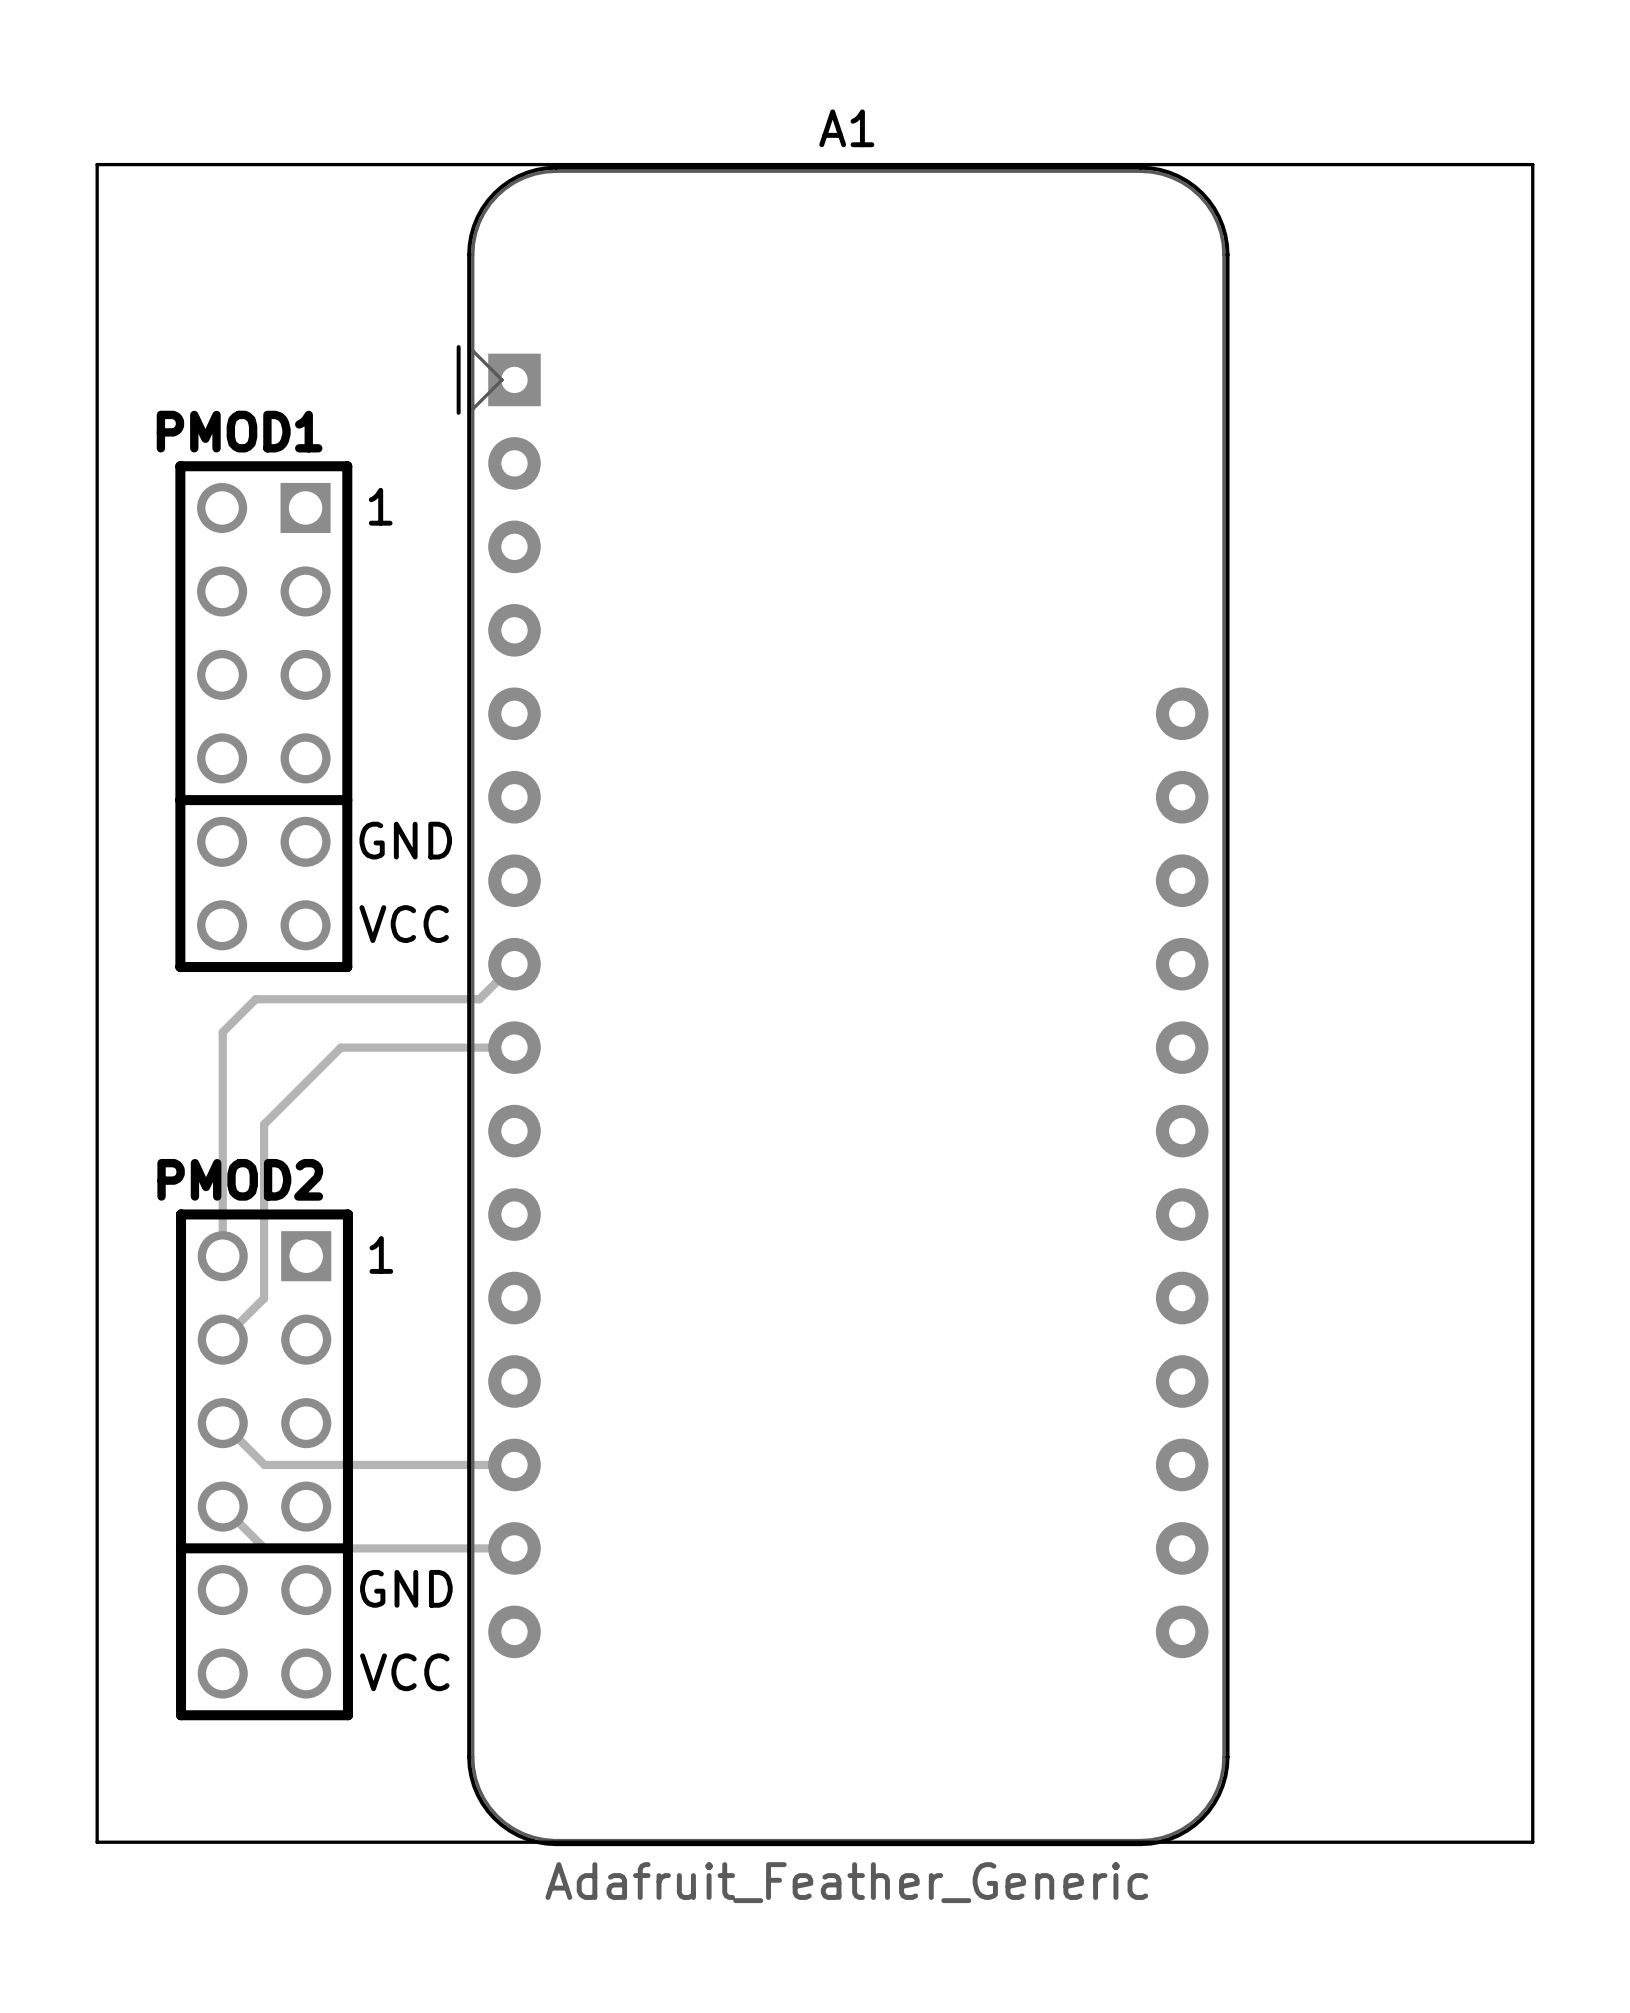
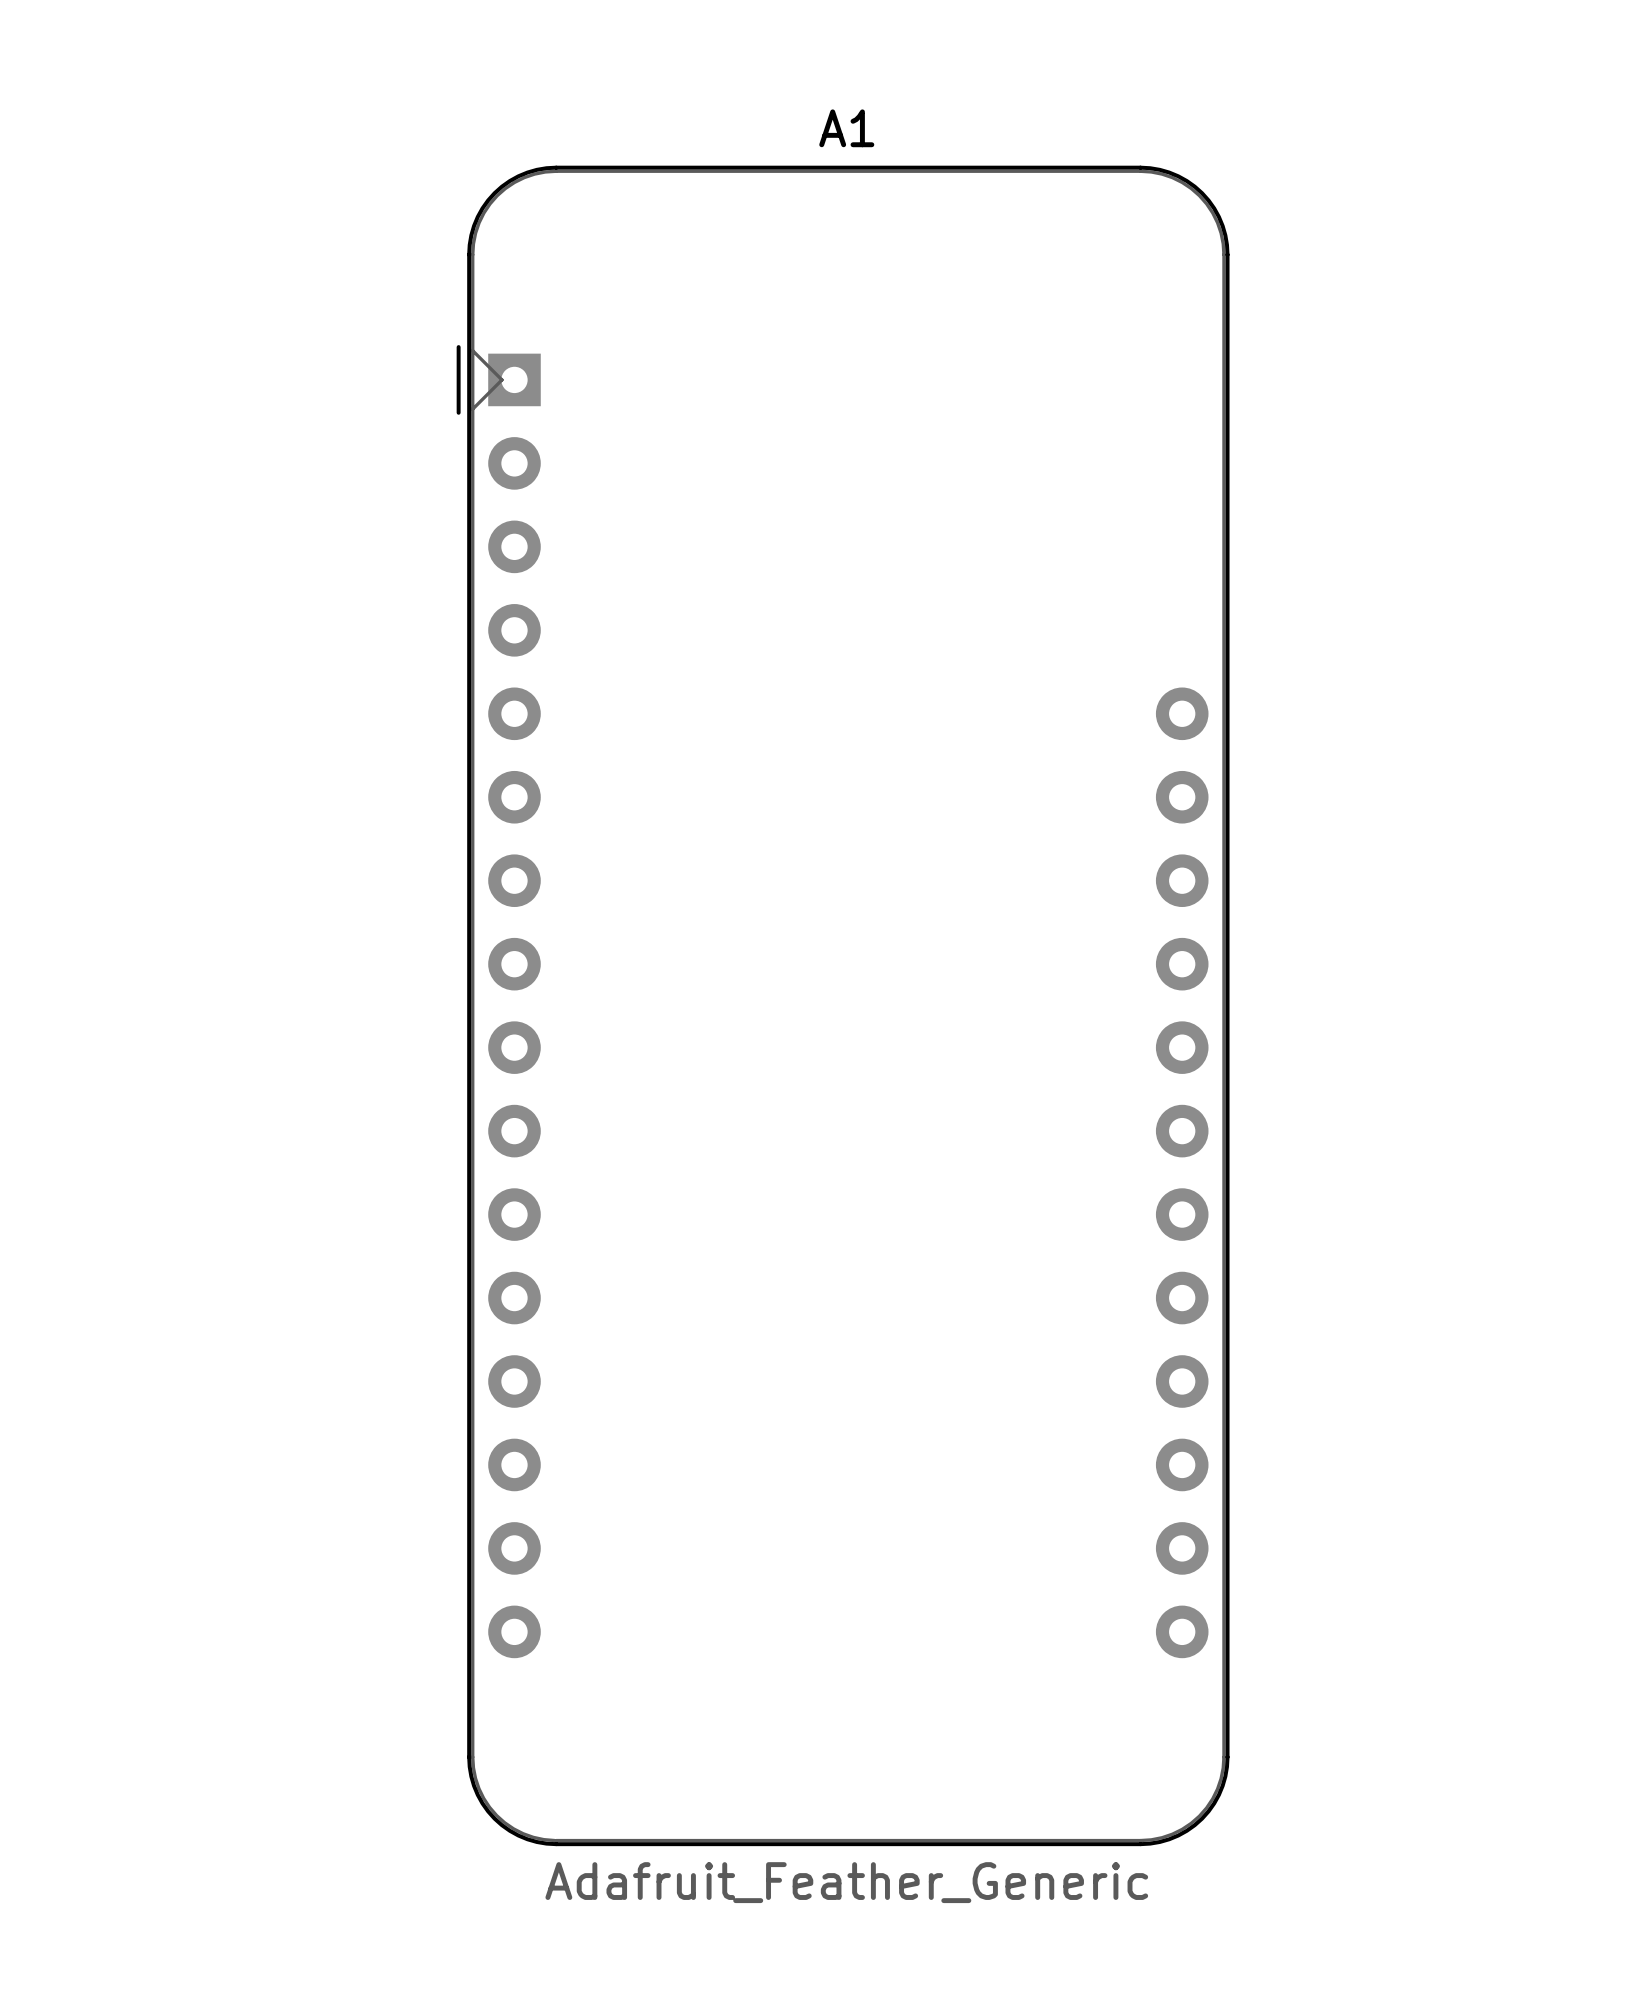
board edge: (97, 164) (1532, 164) (1532, 1842) (97, 1842) (97, 164) -> none
PMOD1: (263, 716) -> none
track: (514, 964) (479, 999) (255, 999) (222, 1032) (222, 1256) -> none
track: (514, 1047) (340, 1047) (264, 1124) (264, 1298) (222, 1339) -> none
track: (222, 1423) (264, 1464) (514, 1464) -> none
PMOD2: (264, 1464) -> none
track: (222, 1506) (264, 1548) (514, 1548) -> none

